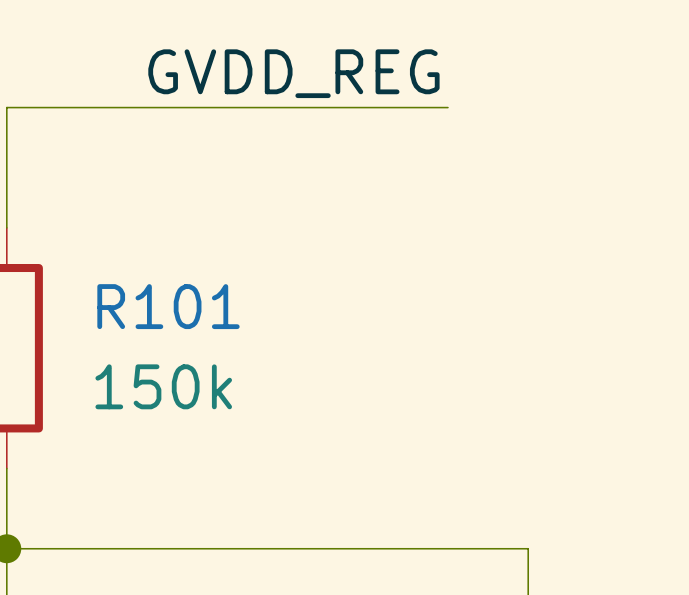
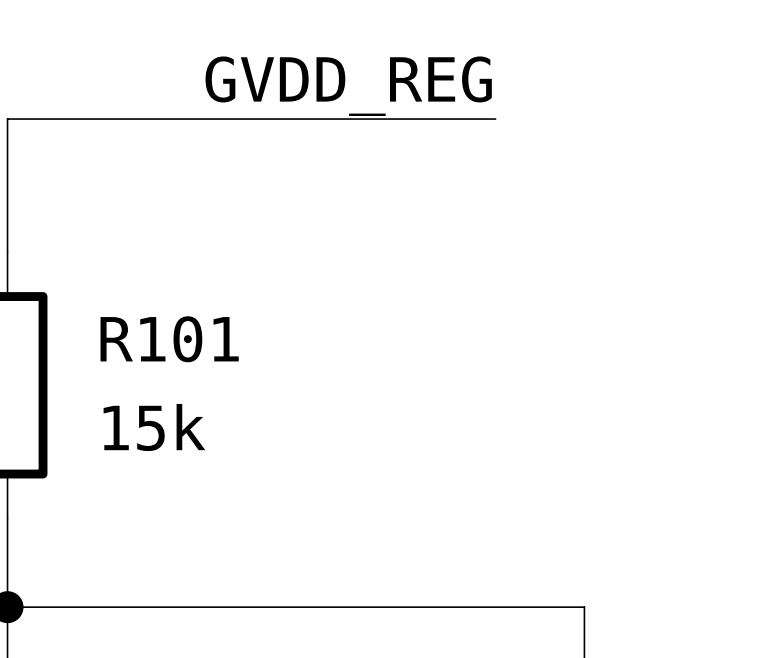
R101 value: 150k (163, 386) -> 15k (154, 427)

